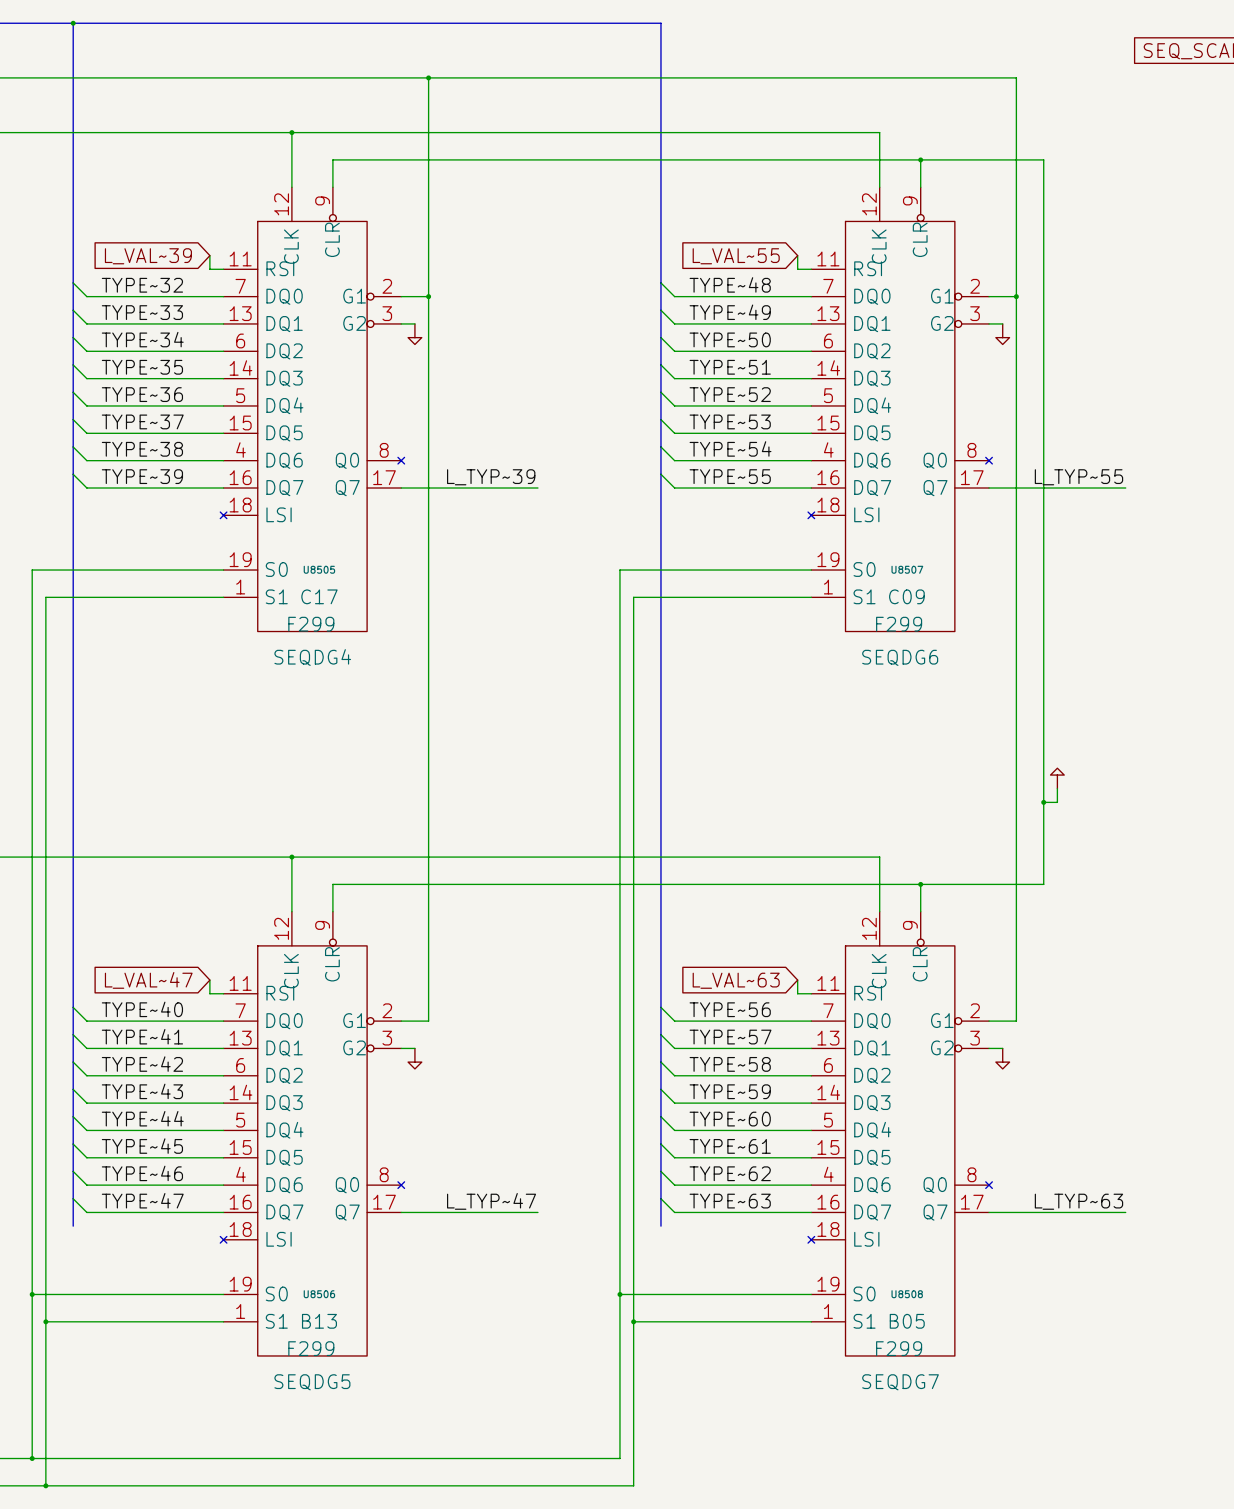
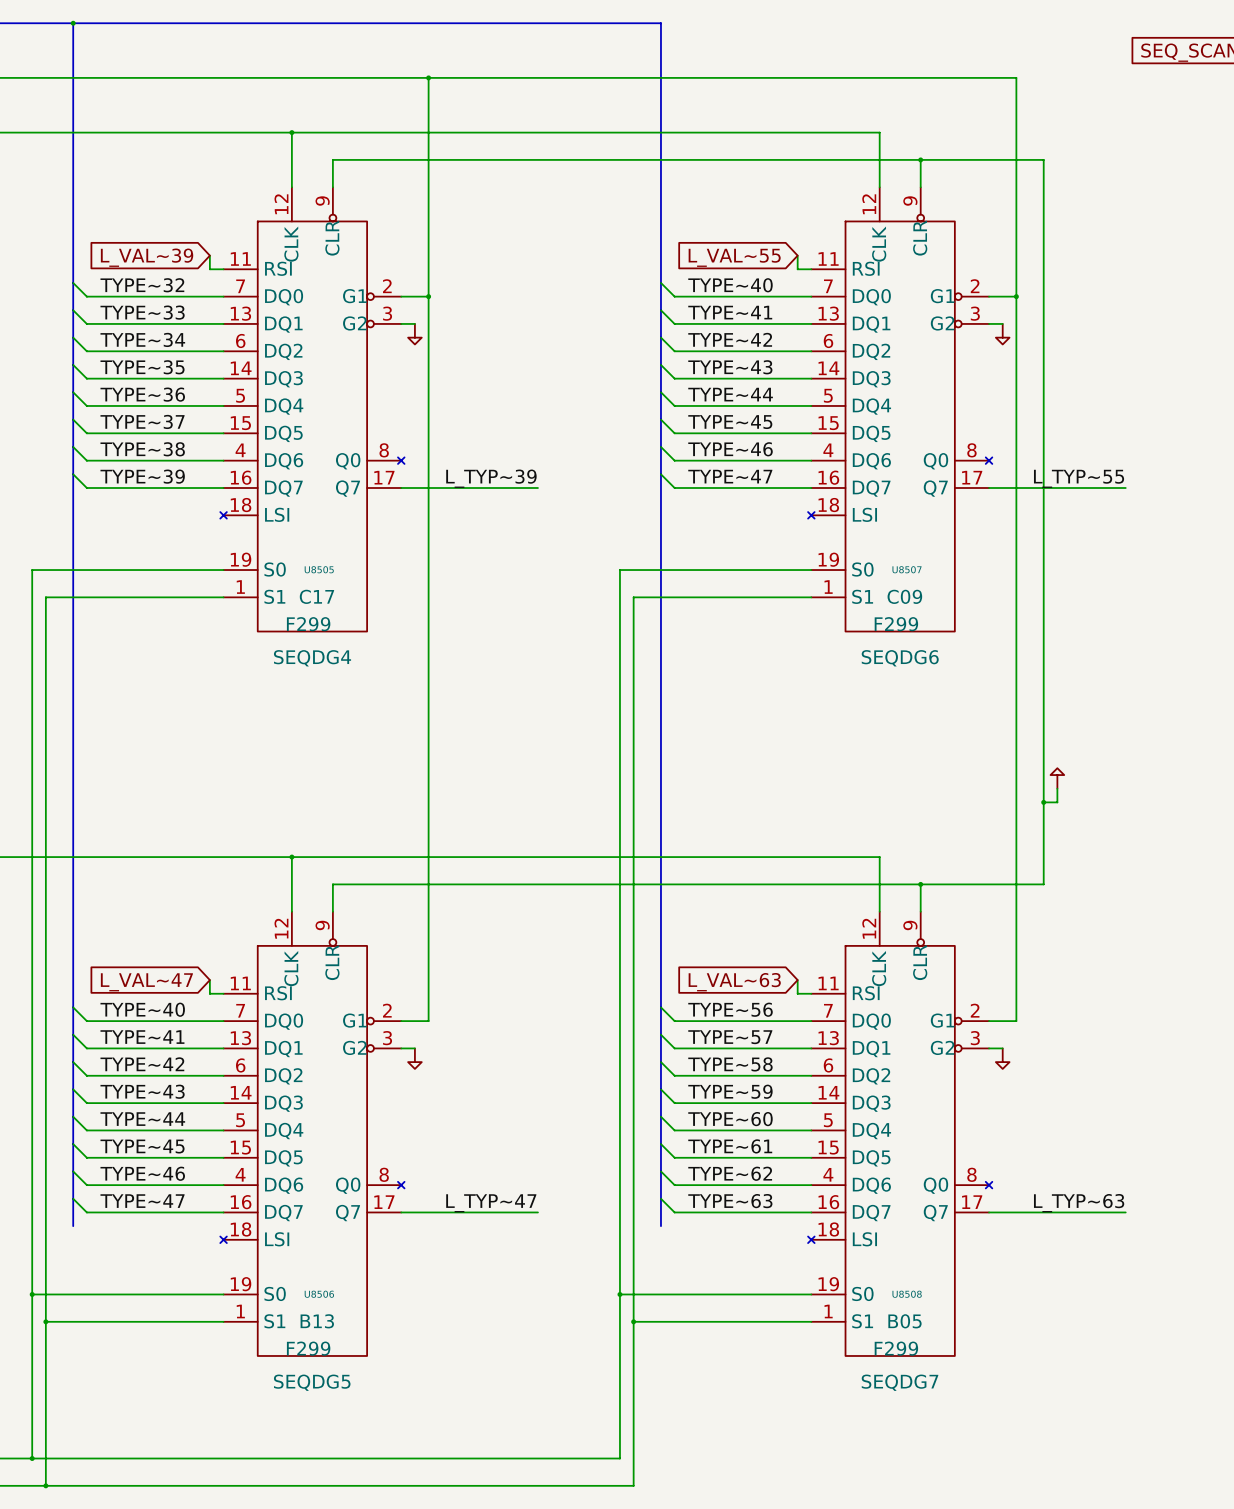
label: TYPE~48 (730, 284) -> TYPE~40 (730, 285)
label: TYPE~49 (730, 312) -> TYPE~41 (730, 312)
label: TYPE~50 (730, 339) -> TYPE~42 (730, 339)
label: TYPE~51 (730, 367) -> TYPE~43 (730, 367)
label: TYPE~52 (730, 394) -> TYPE~44 (730, 394)
label: TYPE~53 (730, 421) -> TYPE~45 (730, 422)
label: TYPE~54 (730, 448) -> TYPE~46 (730, 449)
label: TYPE~55 (730, 476) -> TYPE~47 (730, 476)

